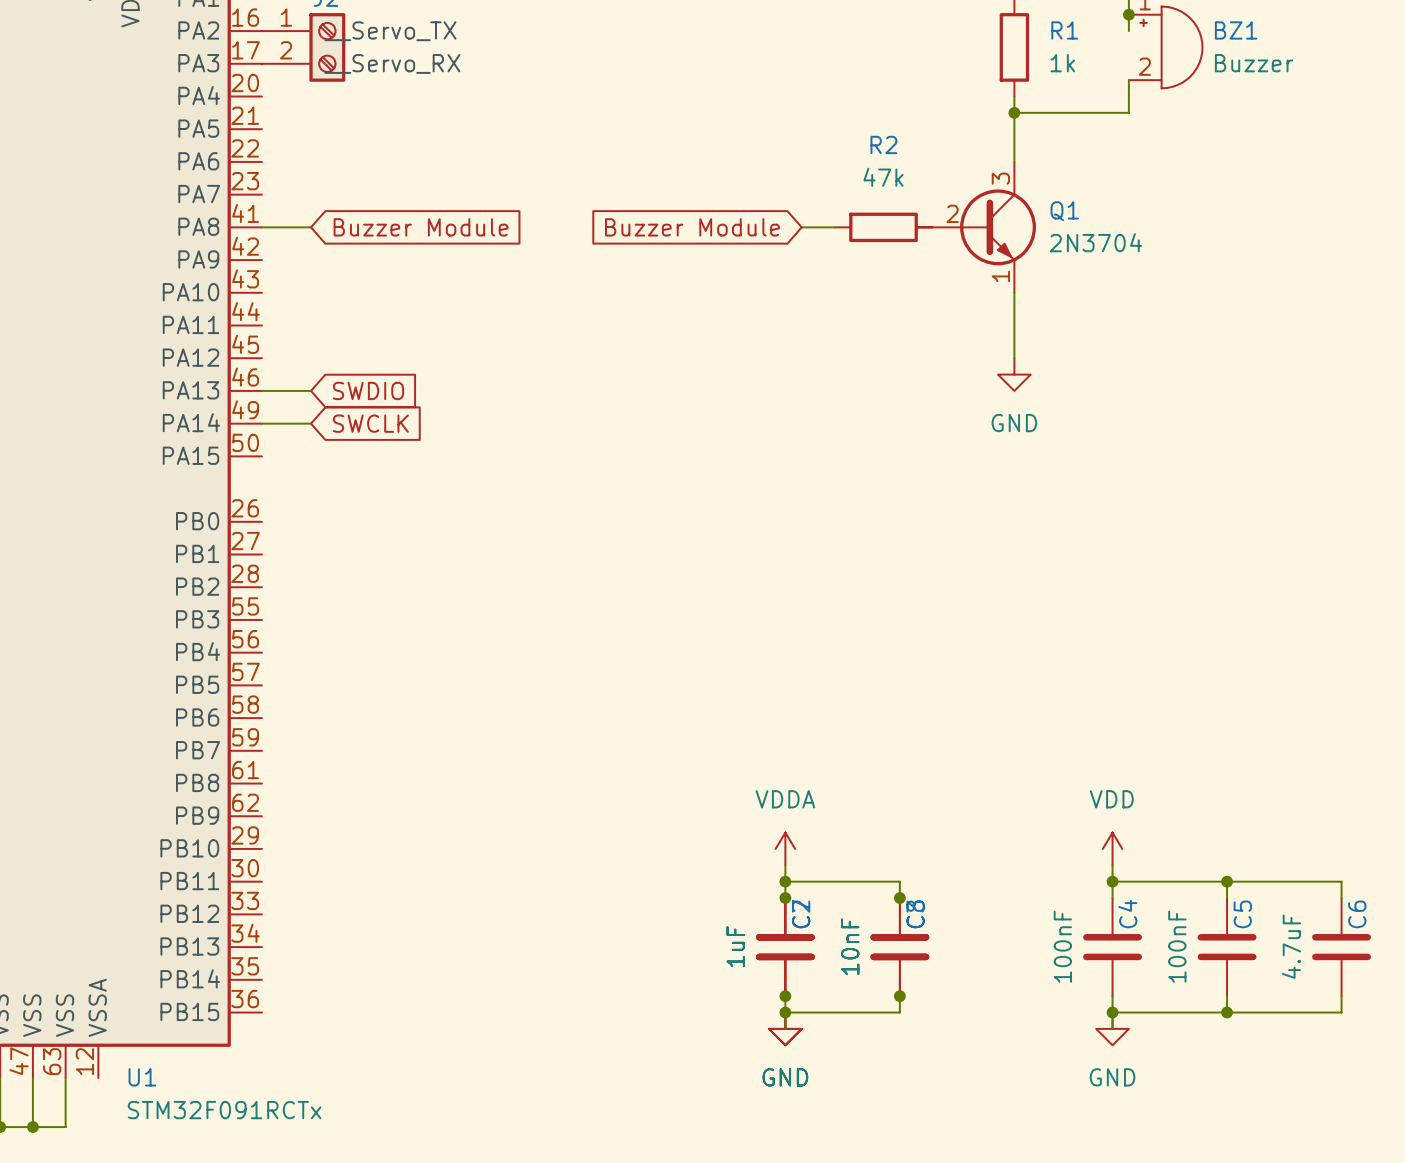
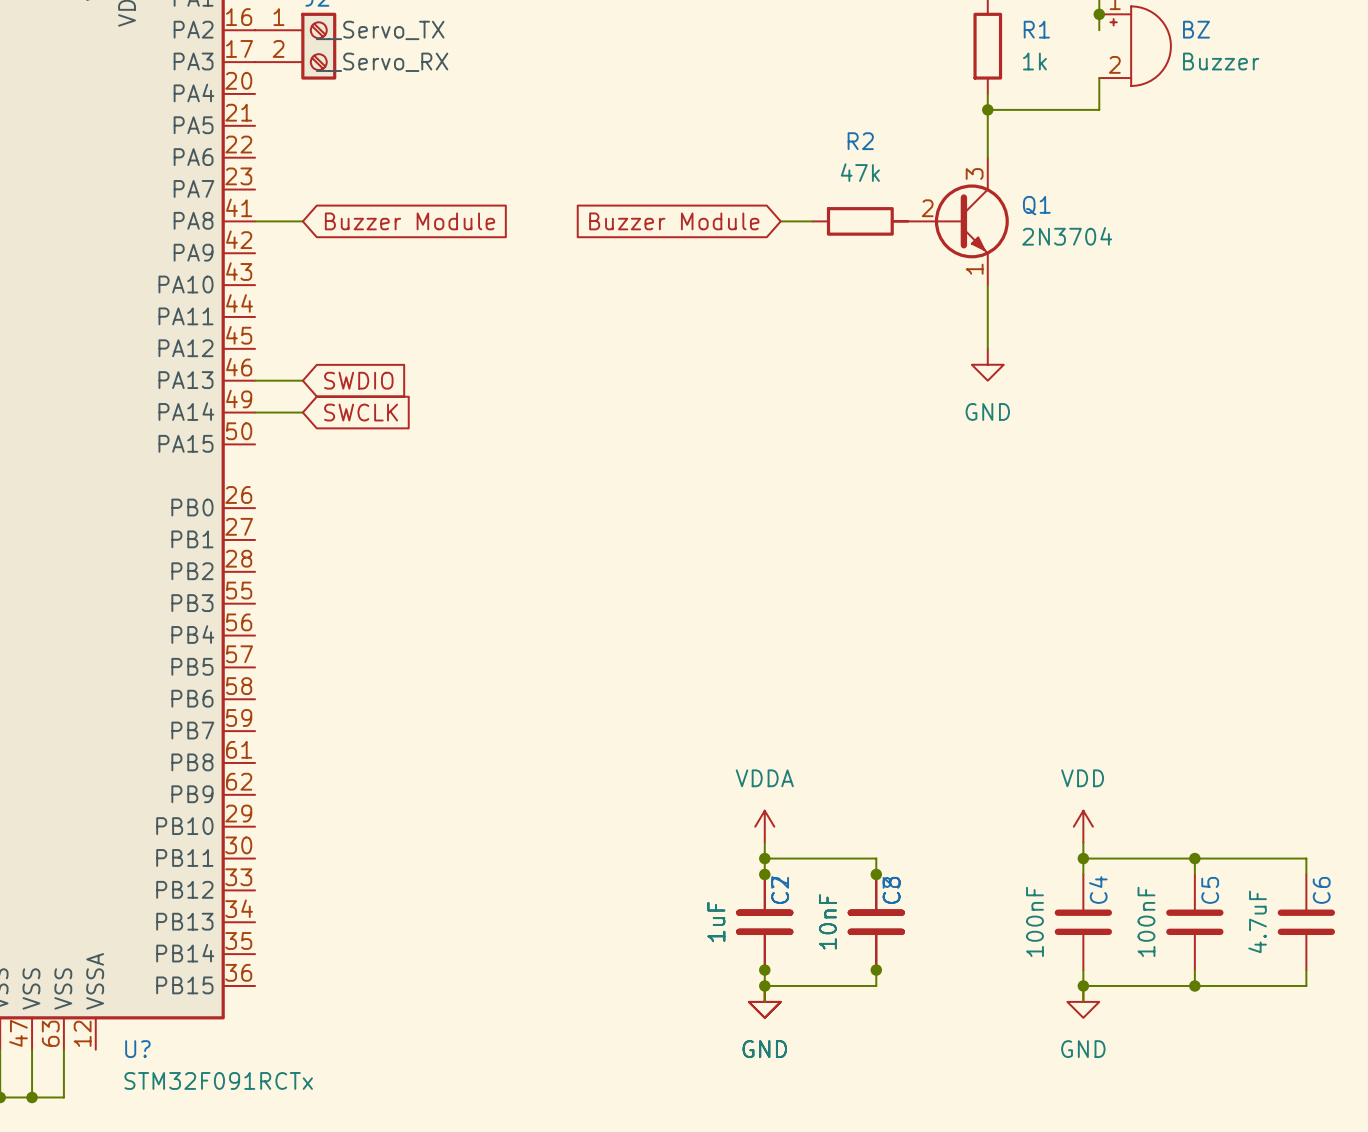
BZ1 name: BZ1 (1236, 30) -> BZ (1196, 29)
U1 name: U1 (142, 1077) -> U? (137, 1049)

